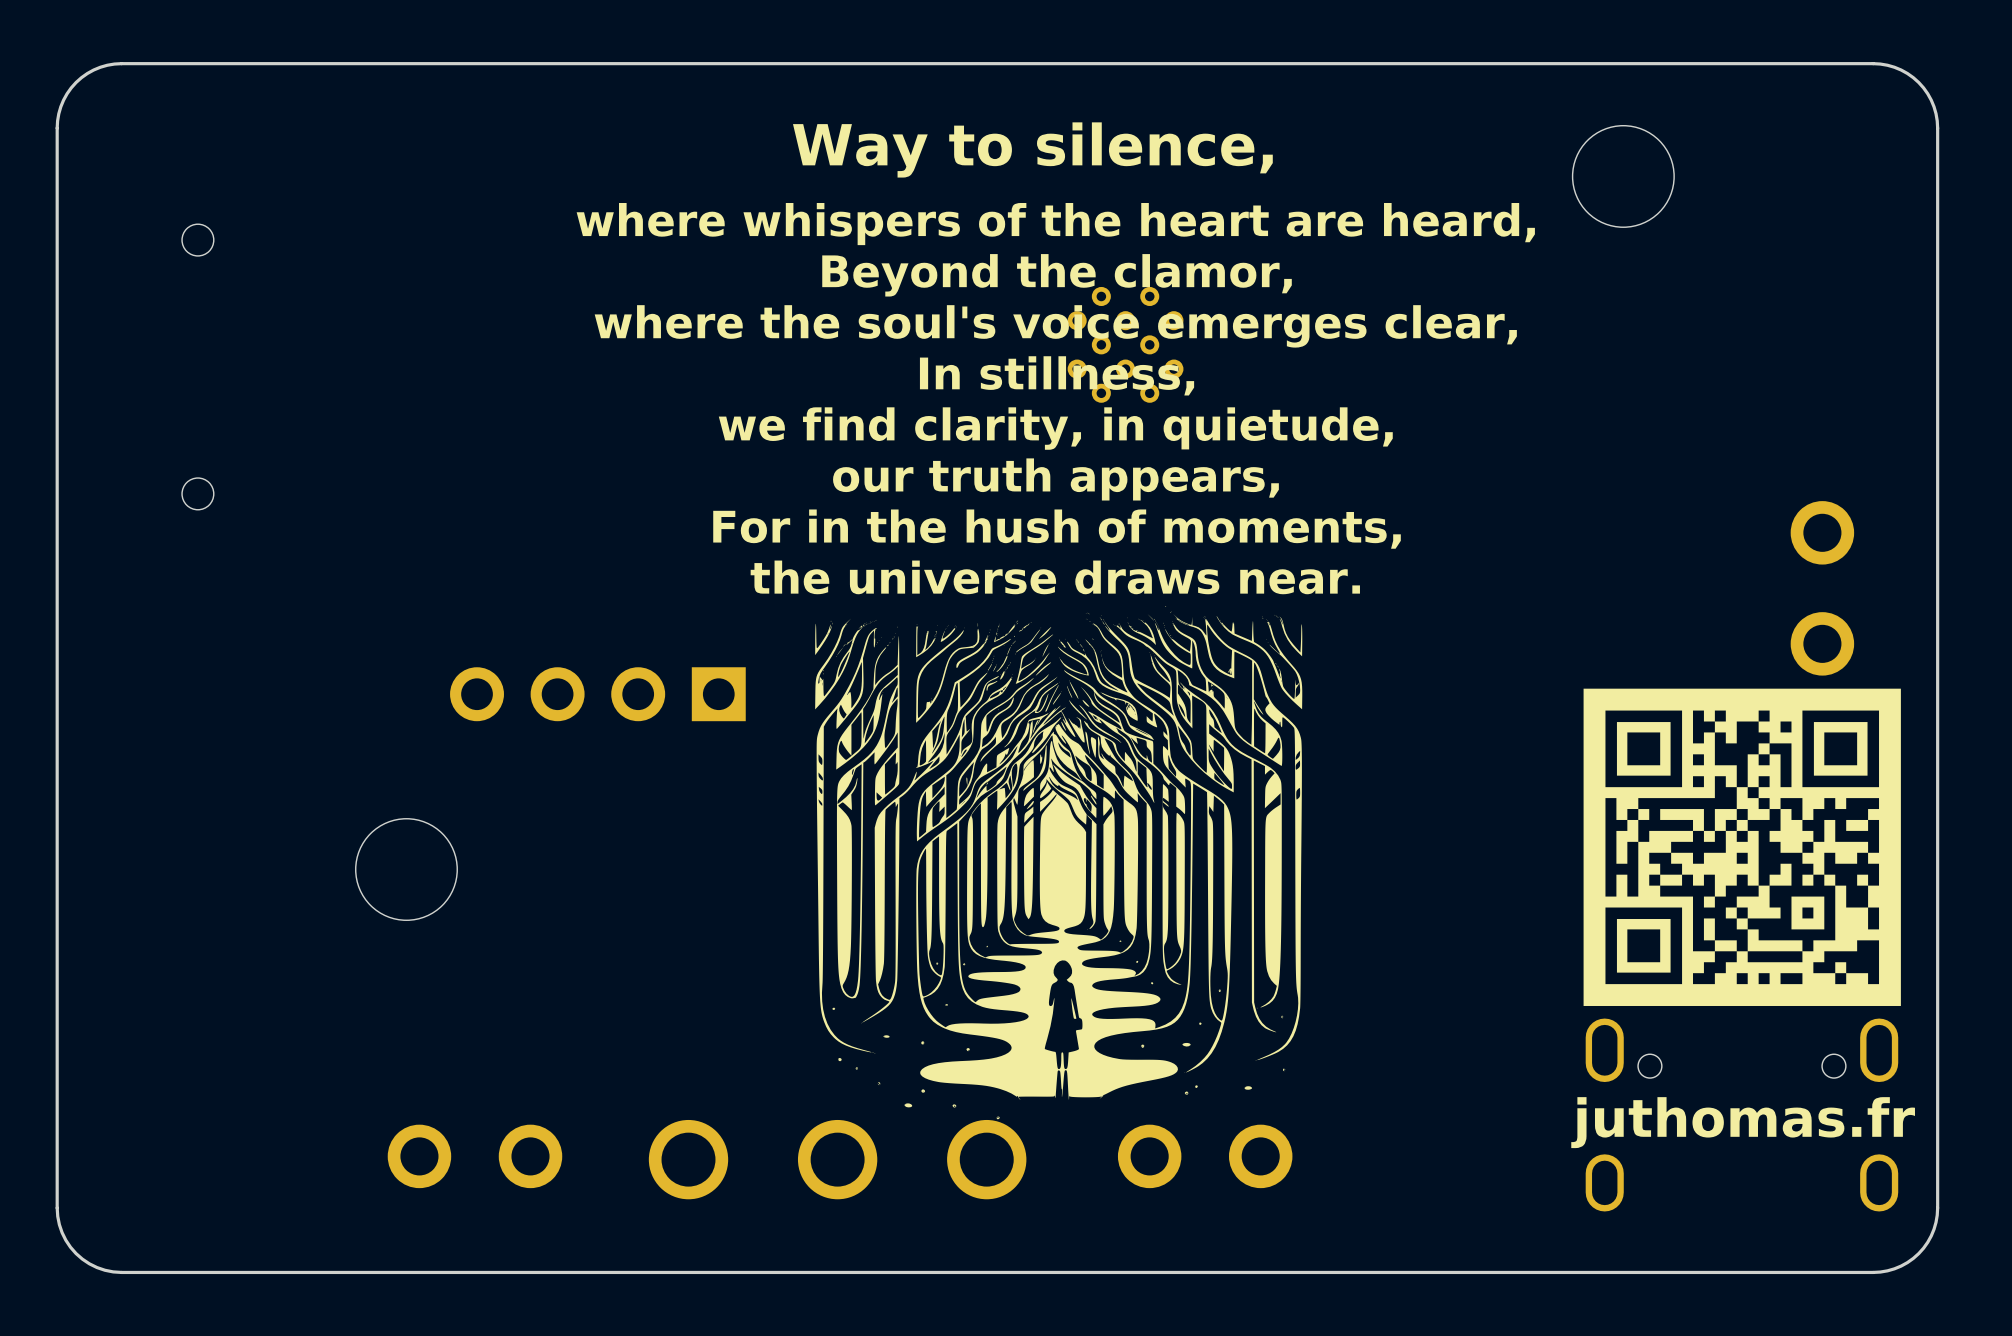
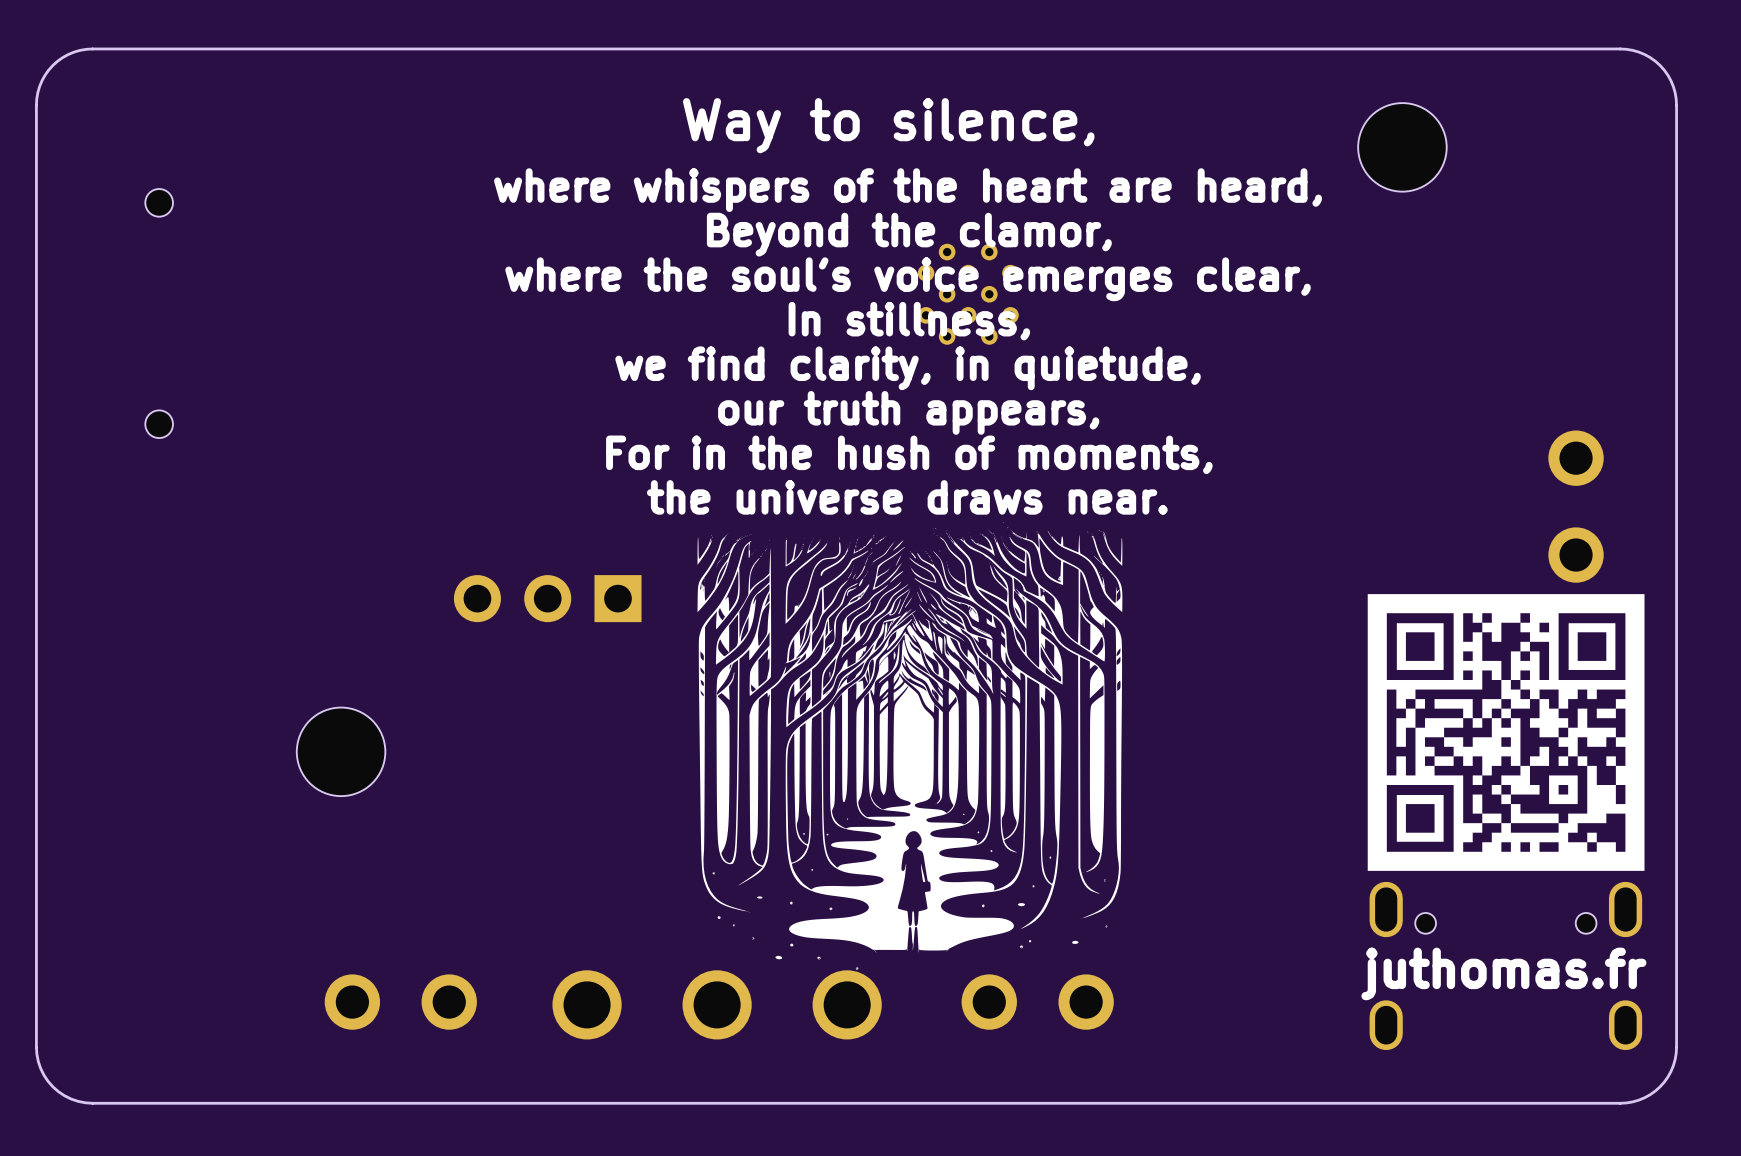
part: none -> (547, 598)
part: (597, 694) -> none

